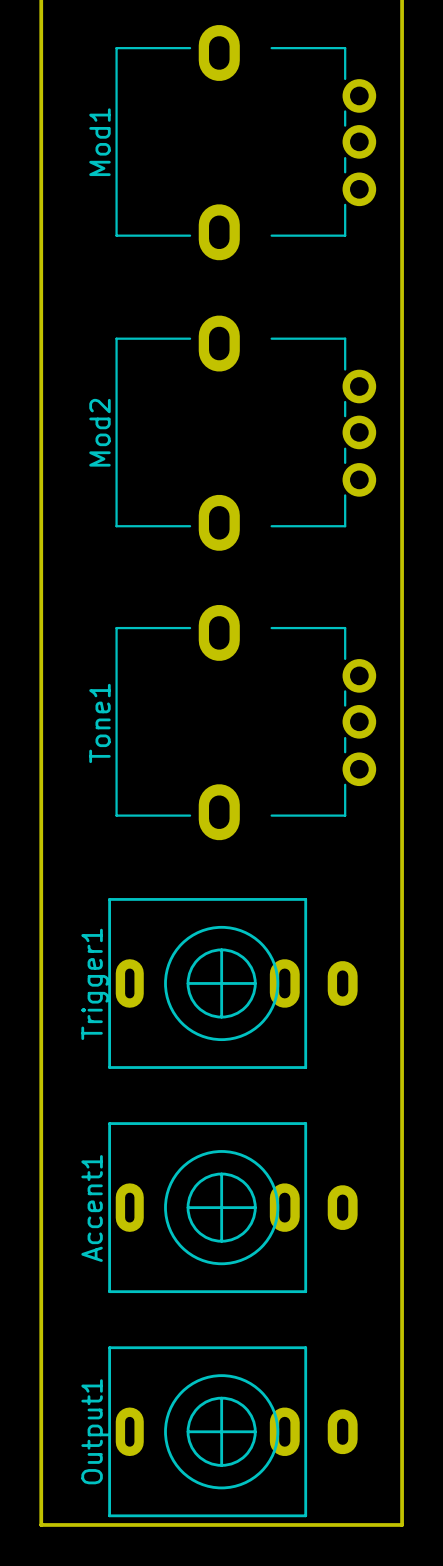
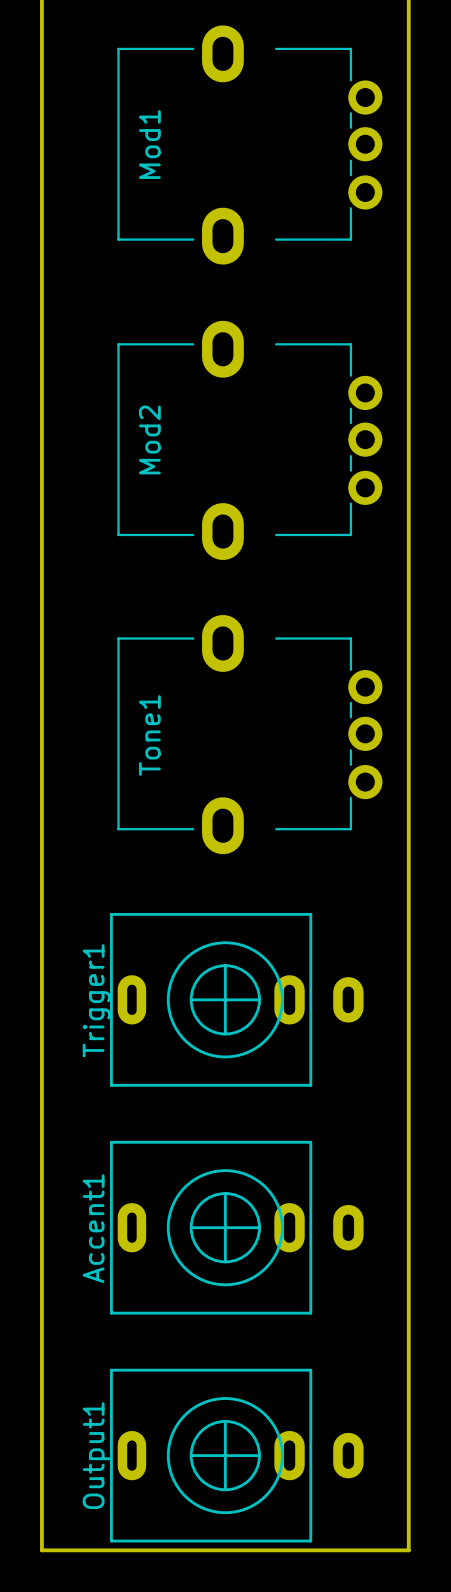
Mod1 name position: Mod1 (99, 142) -> Mod1 (149, 144)
Mod2 name position: Mod2 (99, 432) -> Mod2 (149, 439)
Tone1 name position: Tone1 (99, 723) -> Tone1 (149, 735)

